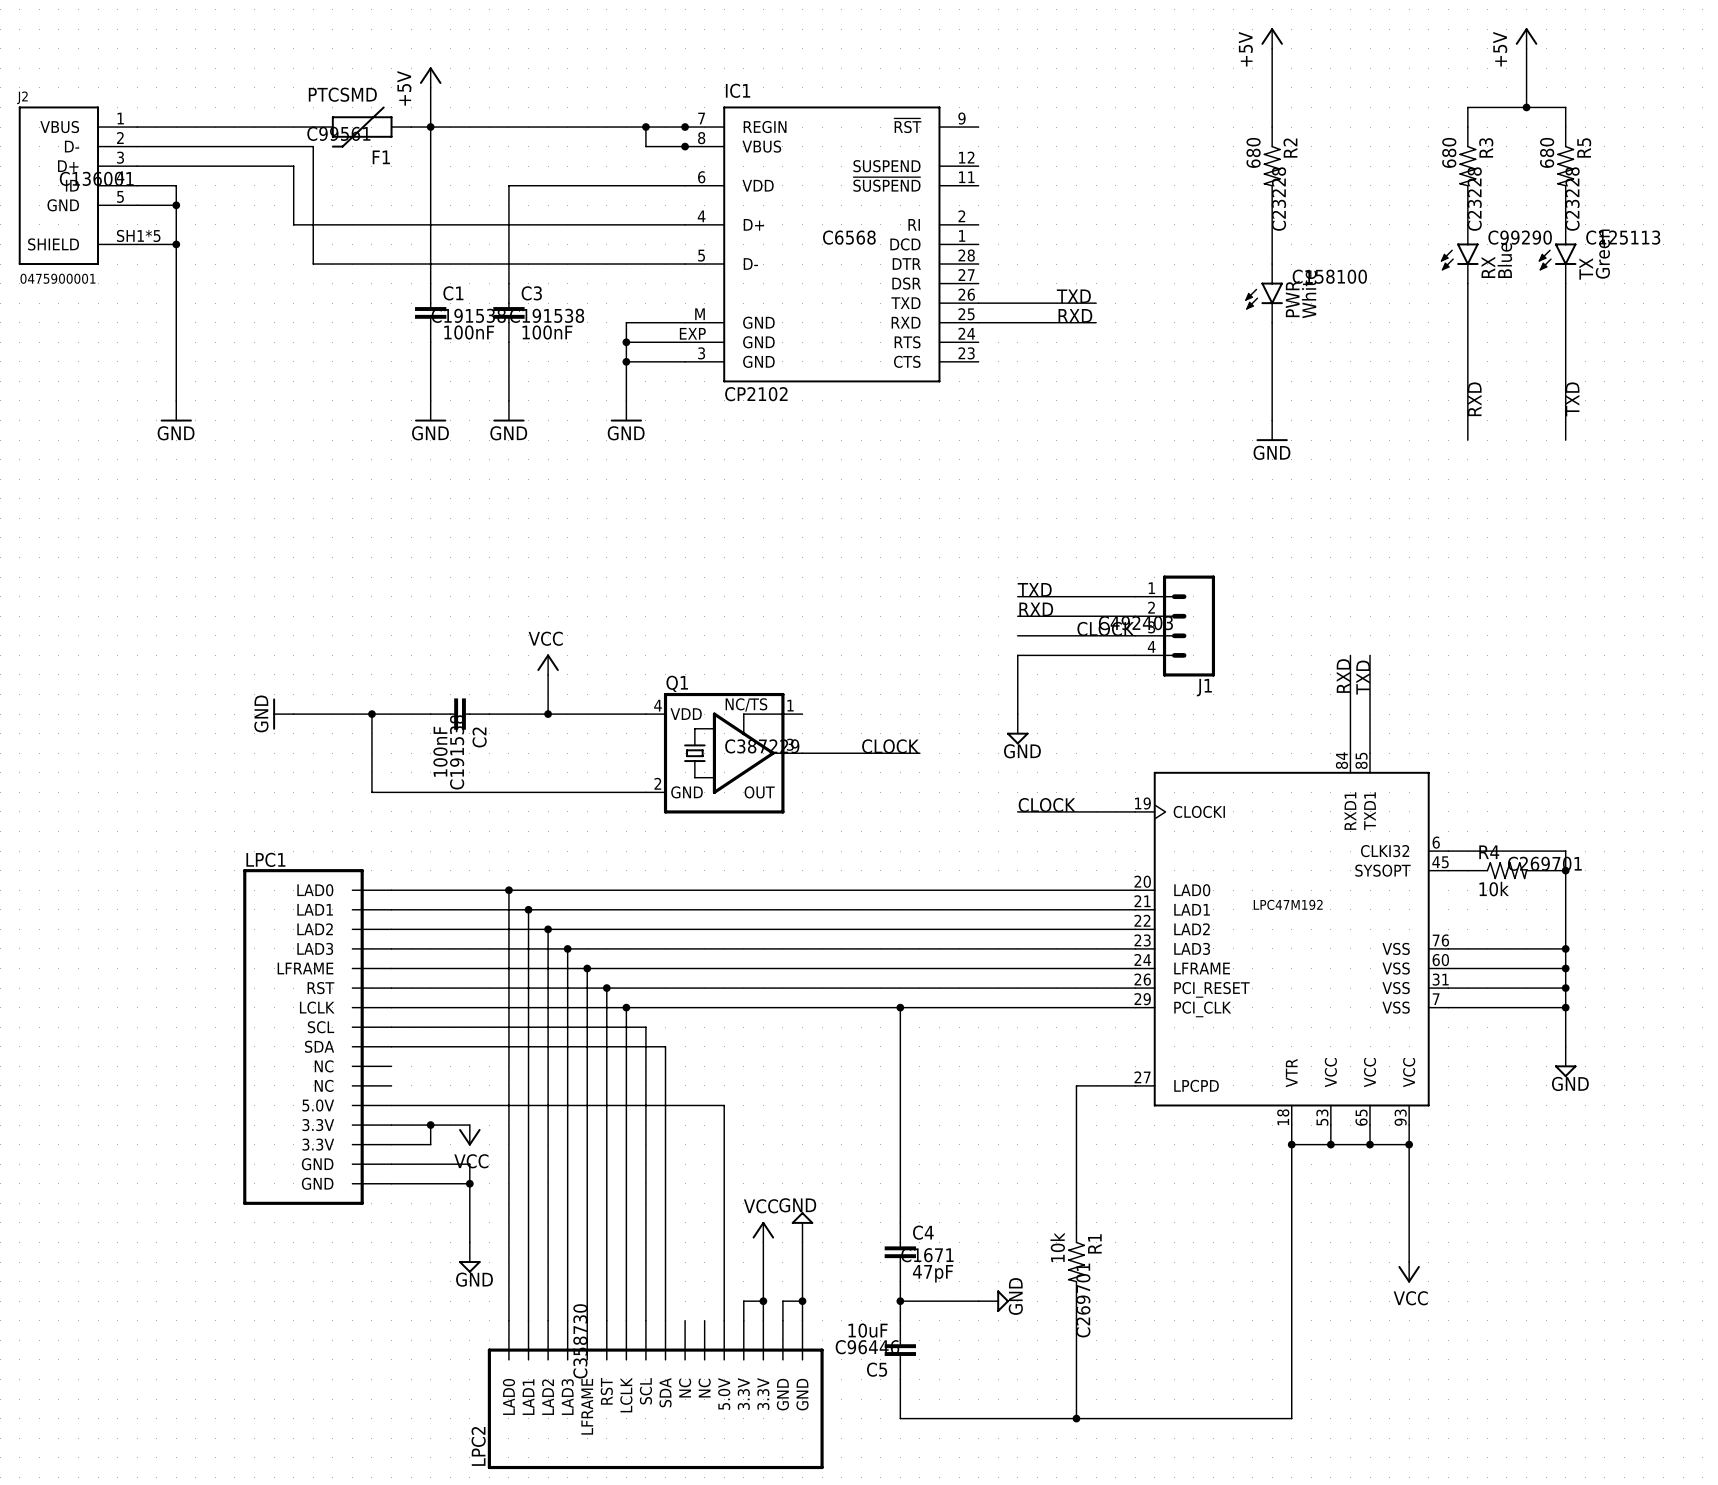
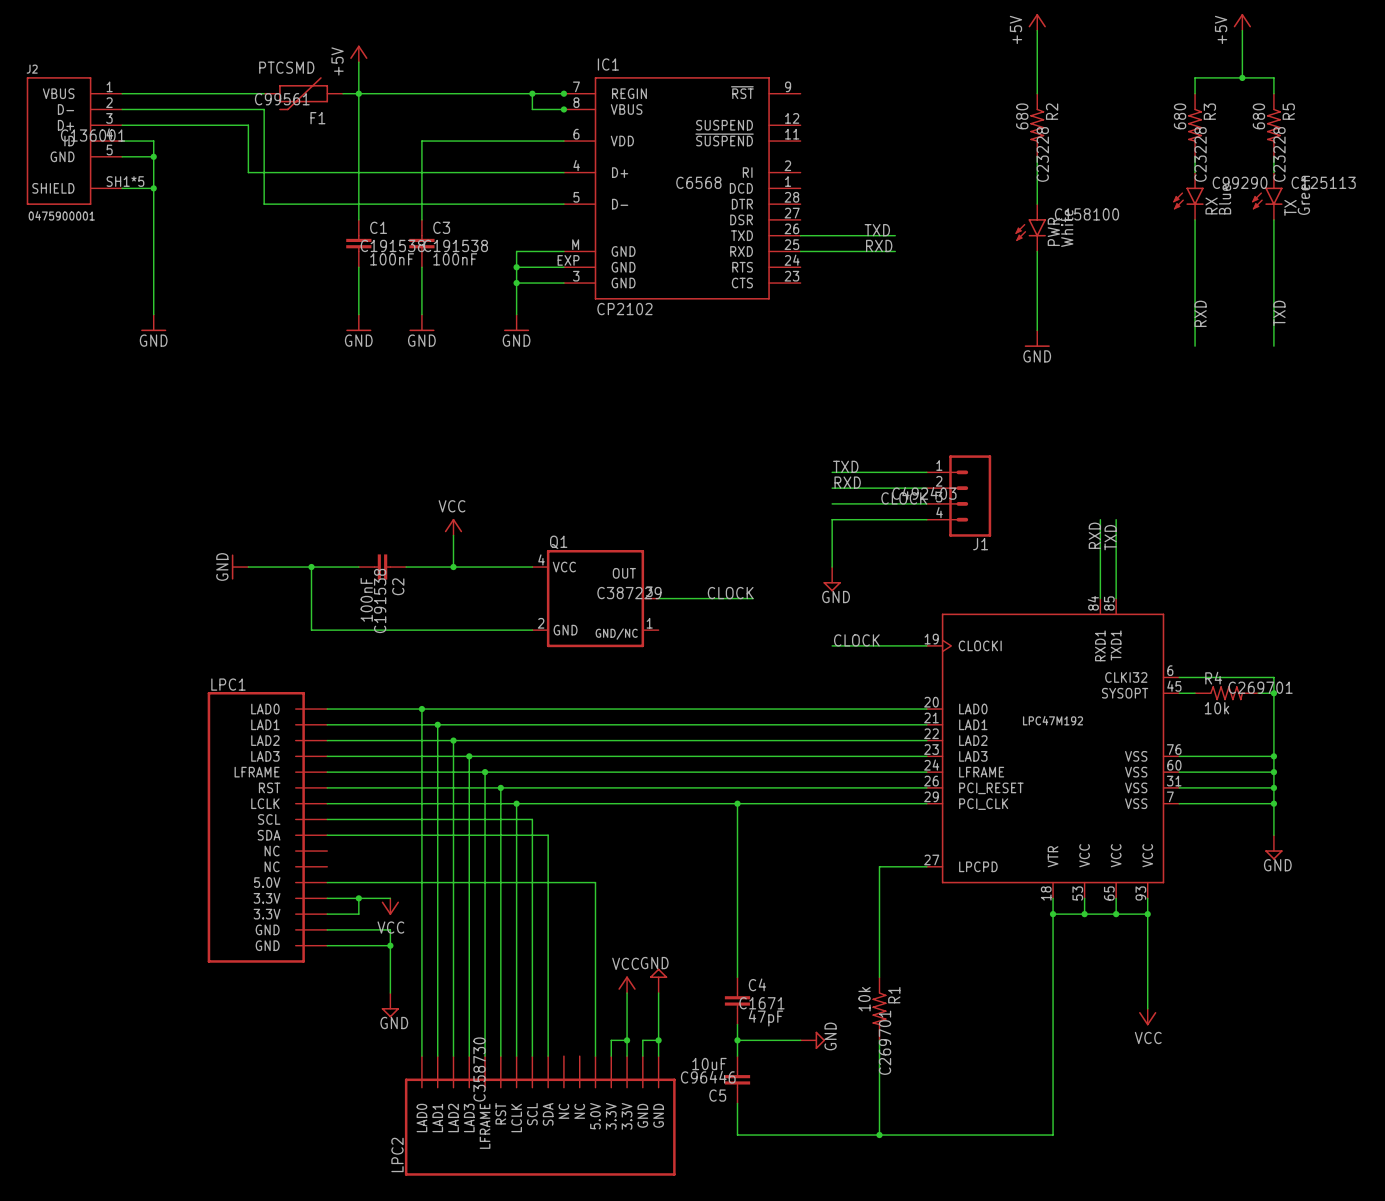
Q1 symbol: [645, 692, 803, 814] -> [532, 549, 659, 648]

